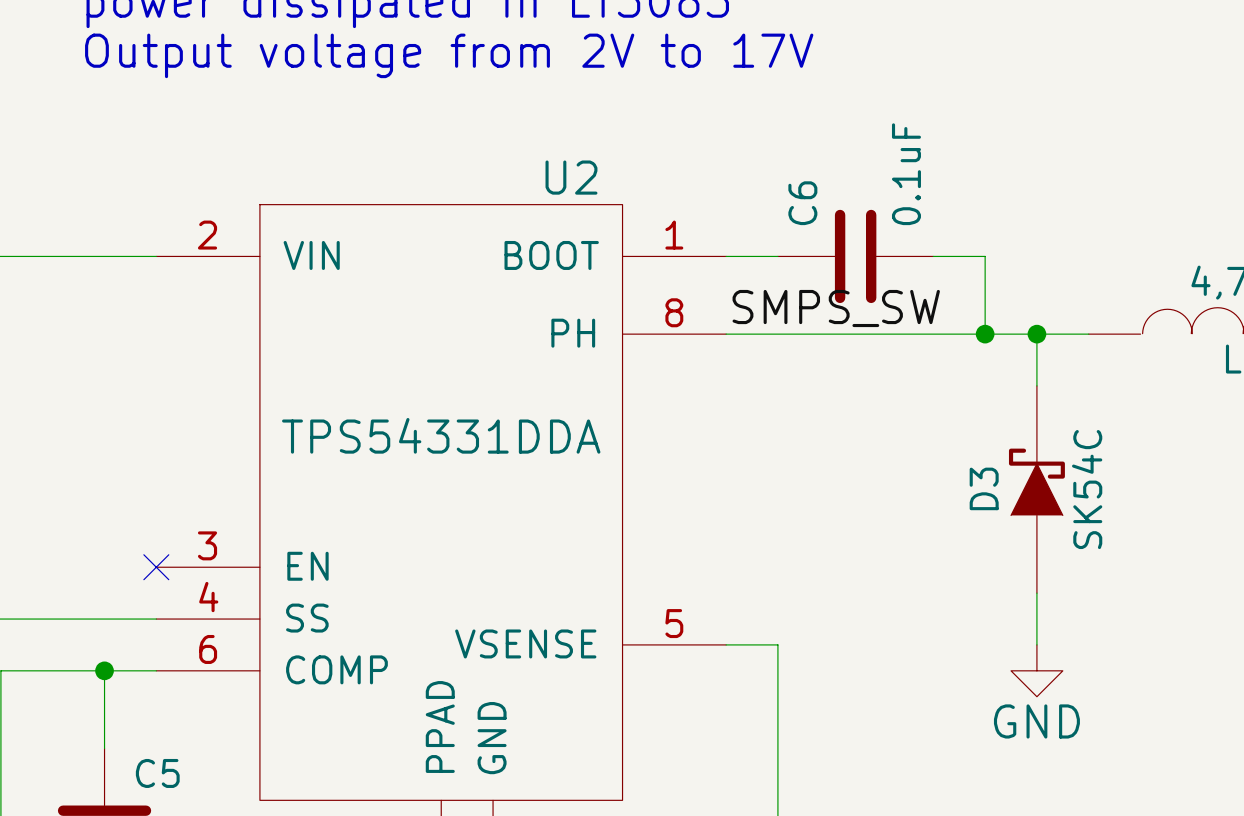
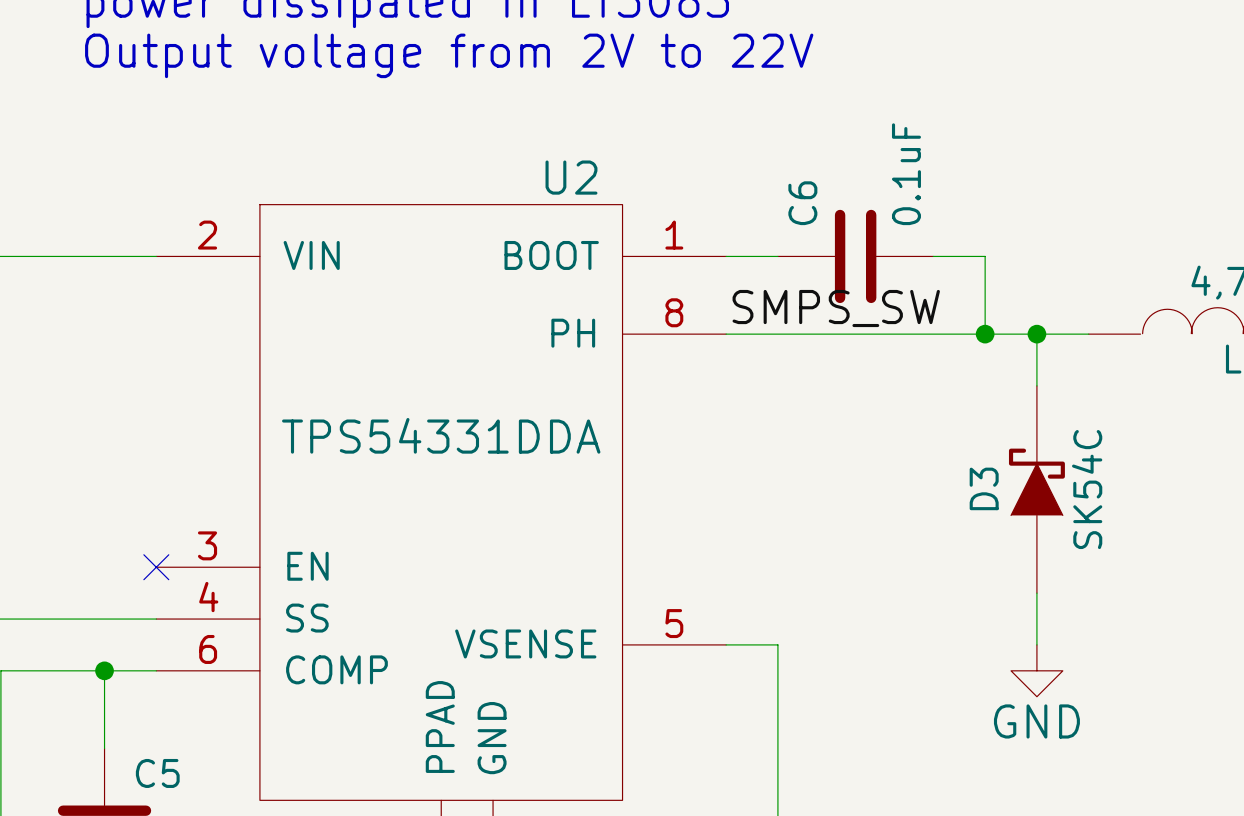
text: Output voltage from 2V to 17V (449, 55) -> Output voltage from 2V to 22V (449, 55)

